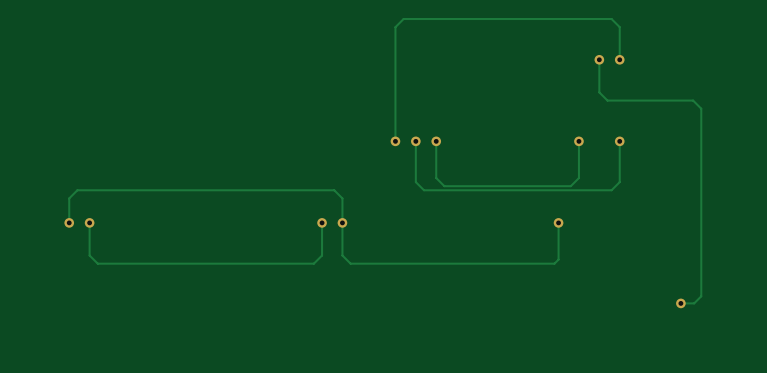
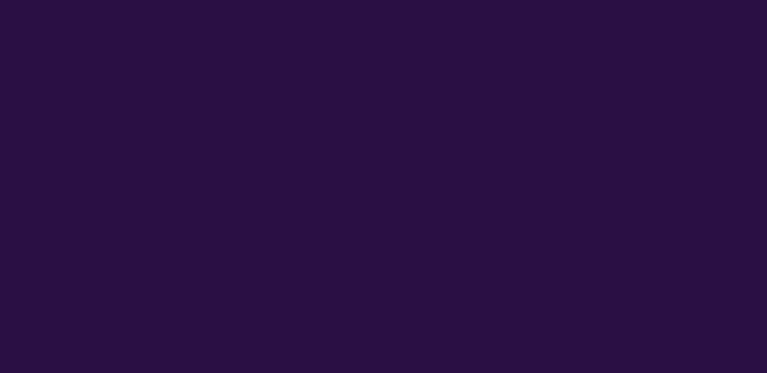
track: (599, 59) (599, 92) (607, 100) (693, 100) (701, 108) (701, 296) (694, 303) (680, 303) -> none
via: (599, 59) -> none
track: (619, 59) (619, 27) (611, 19) (403, 19) (395, 27) (395, 141) -> none
via: (619, 59) -> none
via: (395, 141) -> none
via: (415, 141) -> none
via: (436, 141) -> none
track: (578, 141) (578, 178) (570, 186) (444, 186) (436, 178) (436, 141) -> none
via: (578, 141) -> none
track: (619, 141) (619, 182) (611, 190) (423, 190) (415, 182) (415, 141) -> none
via: (619, 141) -> none
via: (69, 222) -> none
via: (89, 222) -> none
track: (322, 222) (322, 255) (313, 263) (97, 263) (89, 255) (89, 222) -> none
via: (322, 222) -> none
via: (342, 222) -> none
track: (558, 222) (558, 259) (554, 263) (350, 263) (342, 255) (342, 198) (334, 190) (77, 190) (69, 198) (69, 222) -> none
via: (558, 222) -> none
via: (680, 303) -> none

